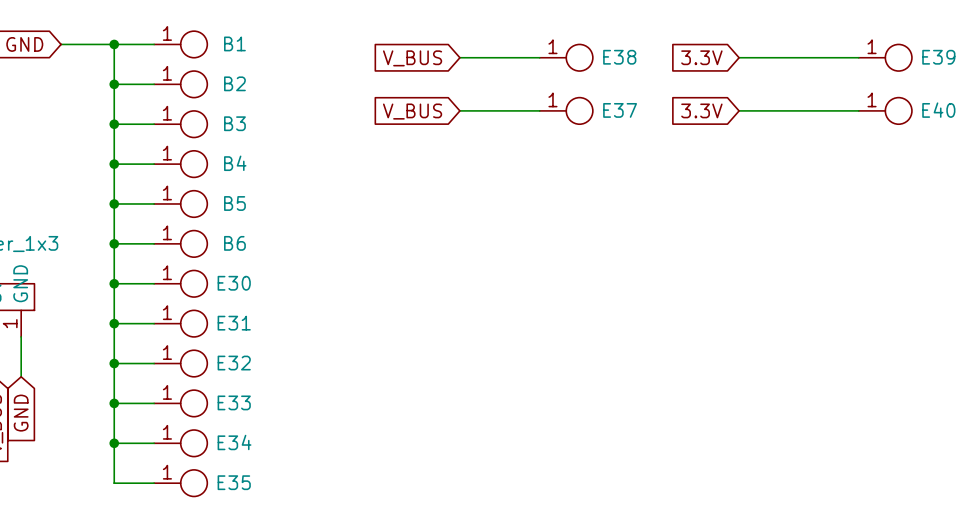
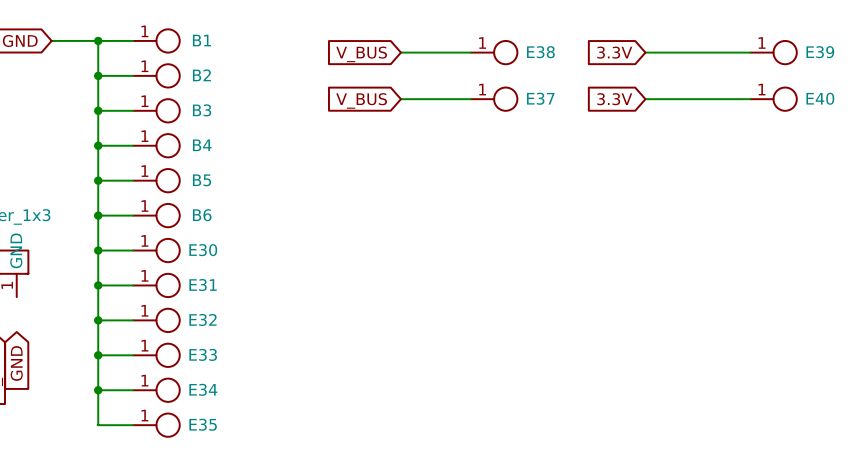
wire: (21, 336) (21, 376) -> none

